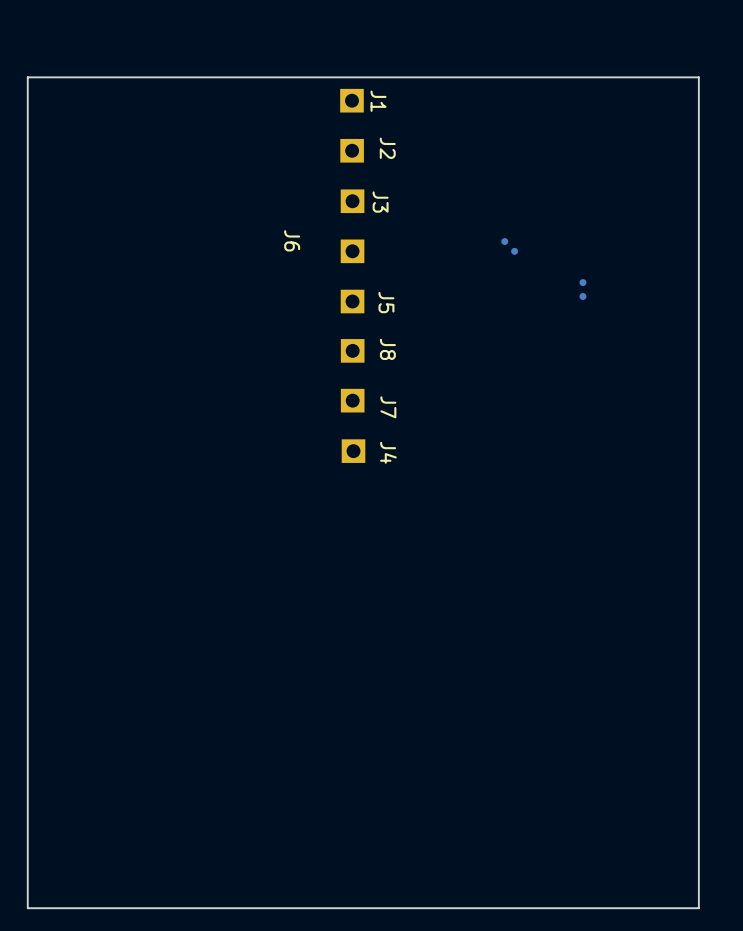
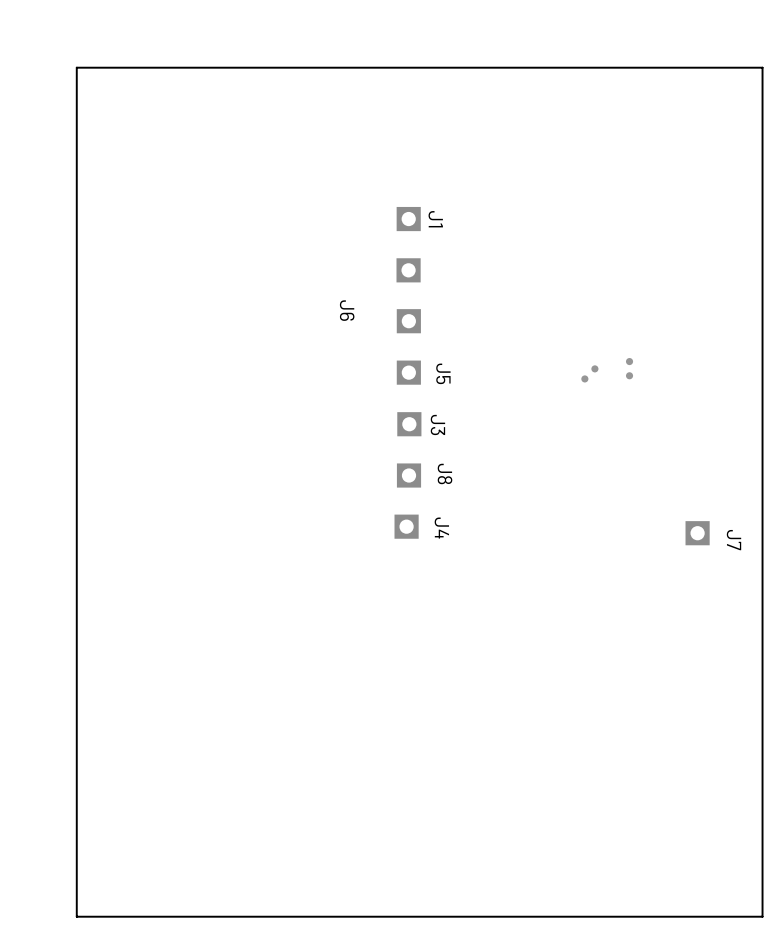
J1 position: (351, 100) -> (408, 219)
J2: (352, 150) -> none
J3 position: (352, 201) -> (409, 424)
part rotation: 0° (509, 246) -> 90° clockwise (589, 373)
part position: (509, 246) -> (589, 373)
J6 position: (352, 251) -> (408, 321)
part: none -> (408, 270)
part position: (582, 289) -> (629, 368)
J5 position: (352, 301) -> (408, 372)
J8 position: (352, 350) -> (409, 475)
J7 position: (352, 400) -> (697, 533)
J4 position: (353, 451) -> (406, 526)

